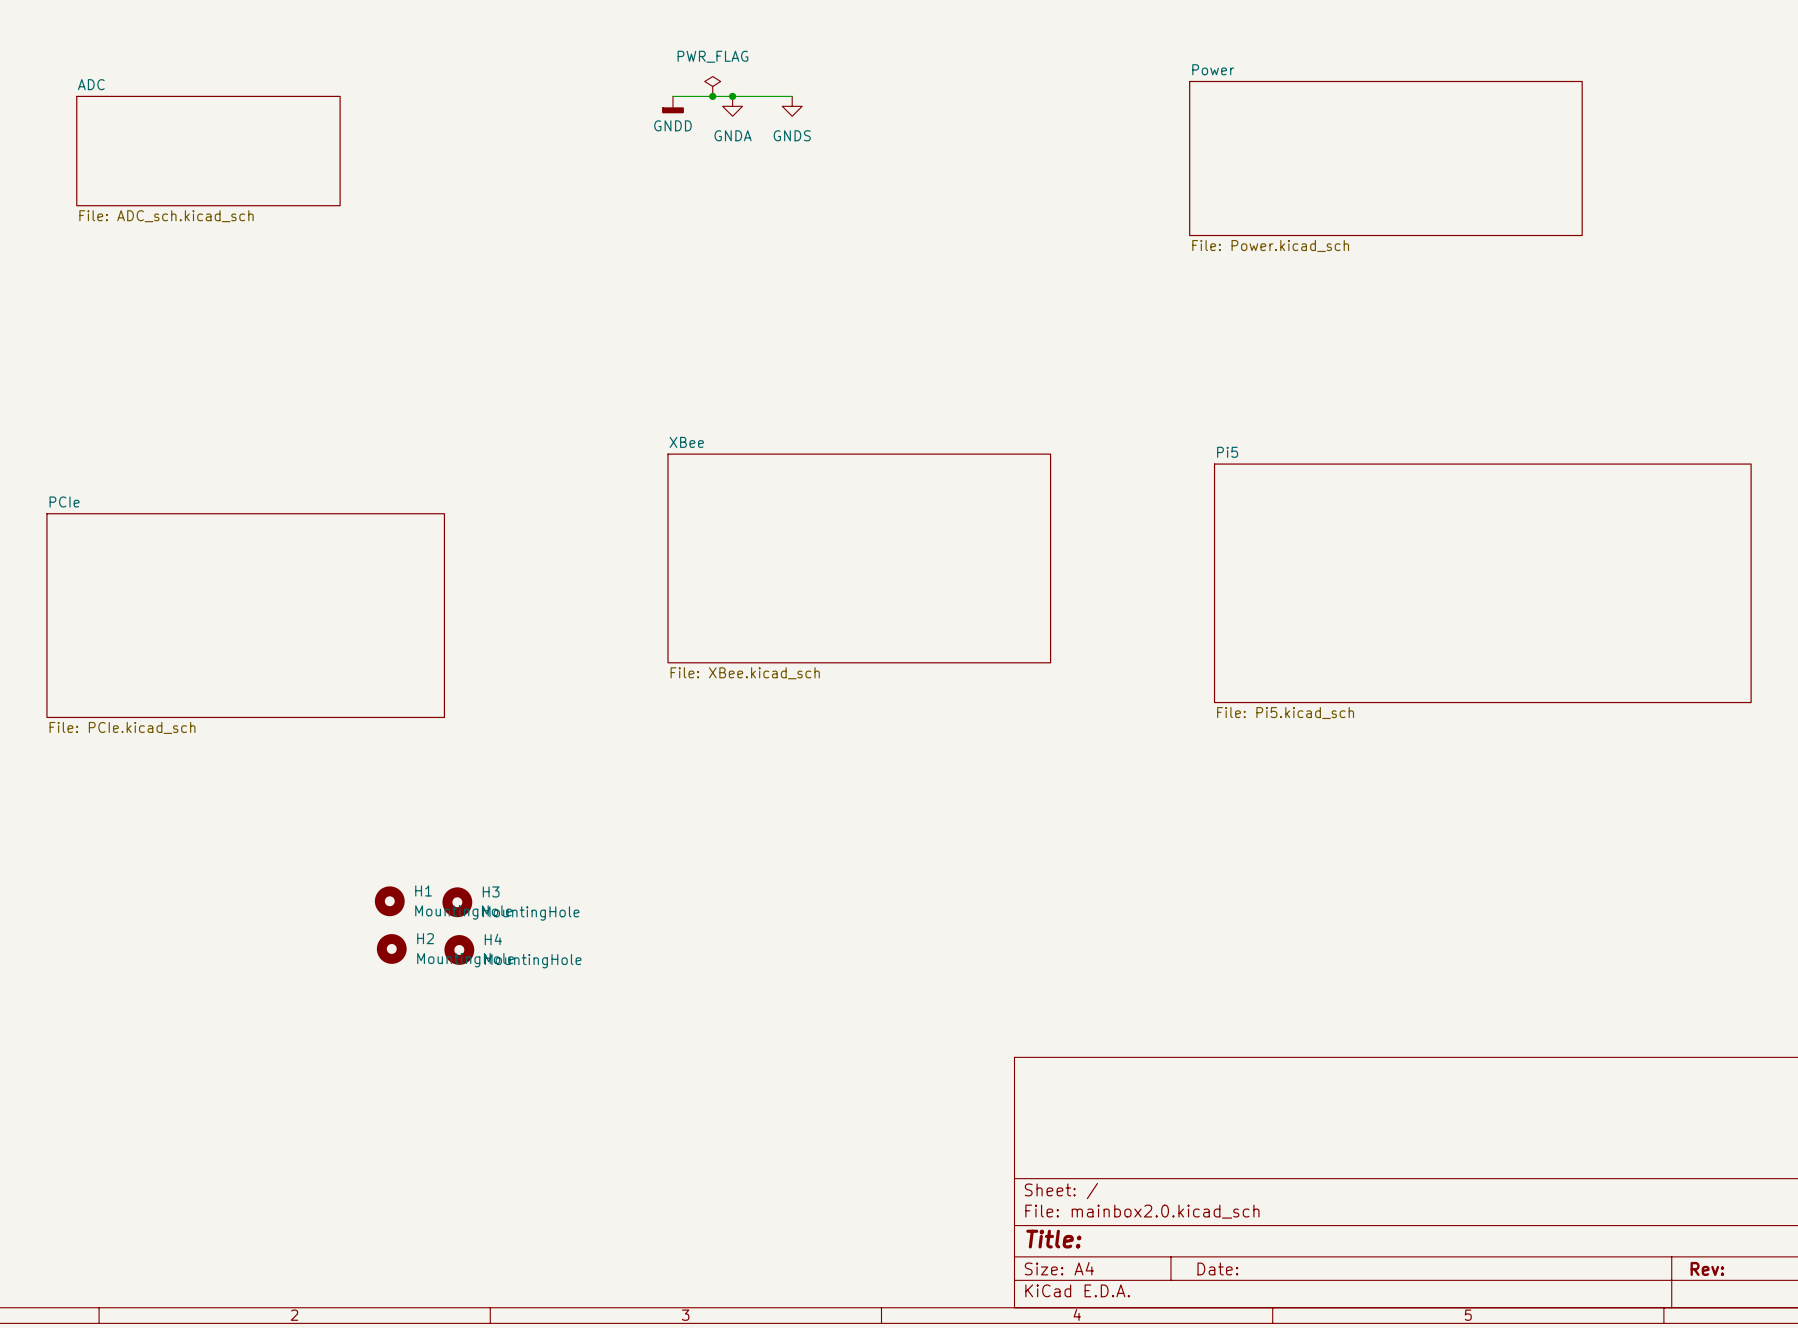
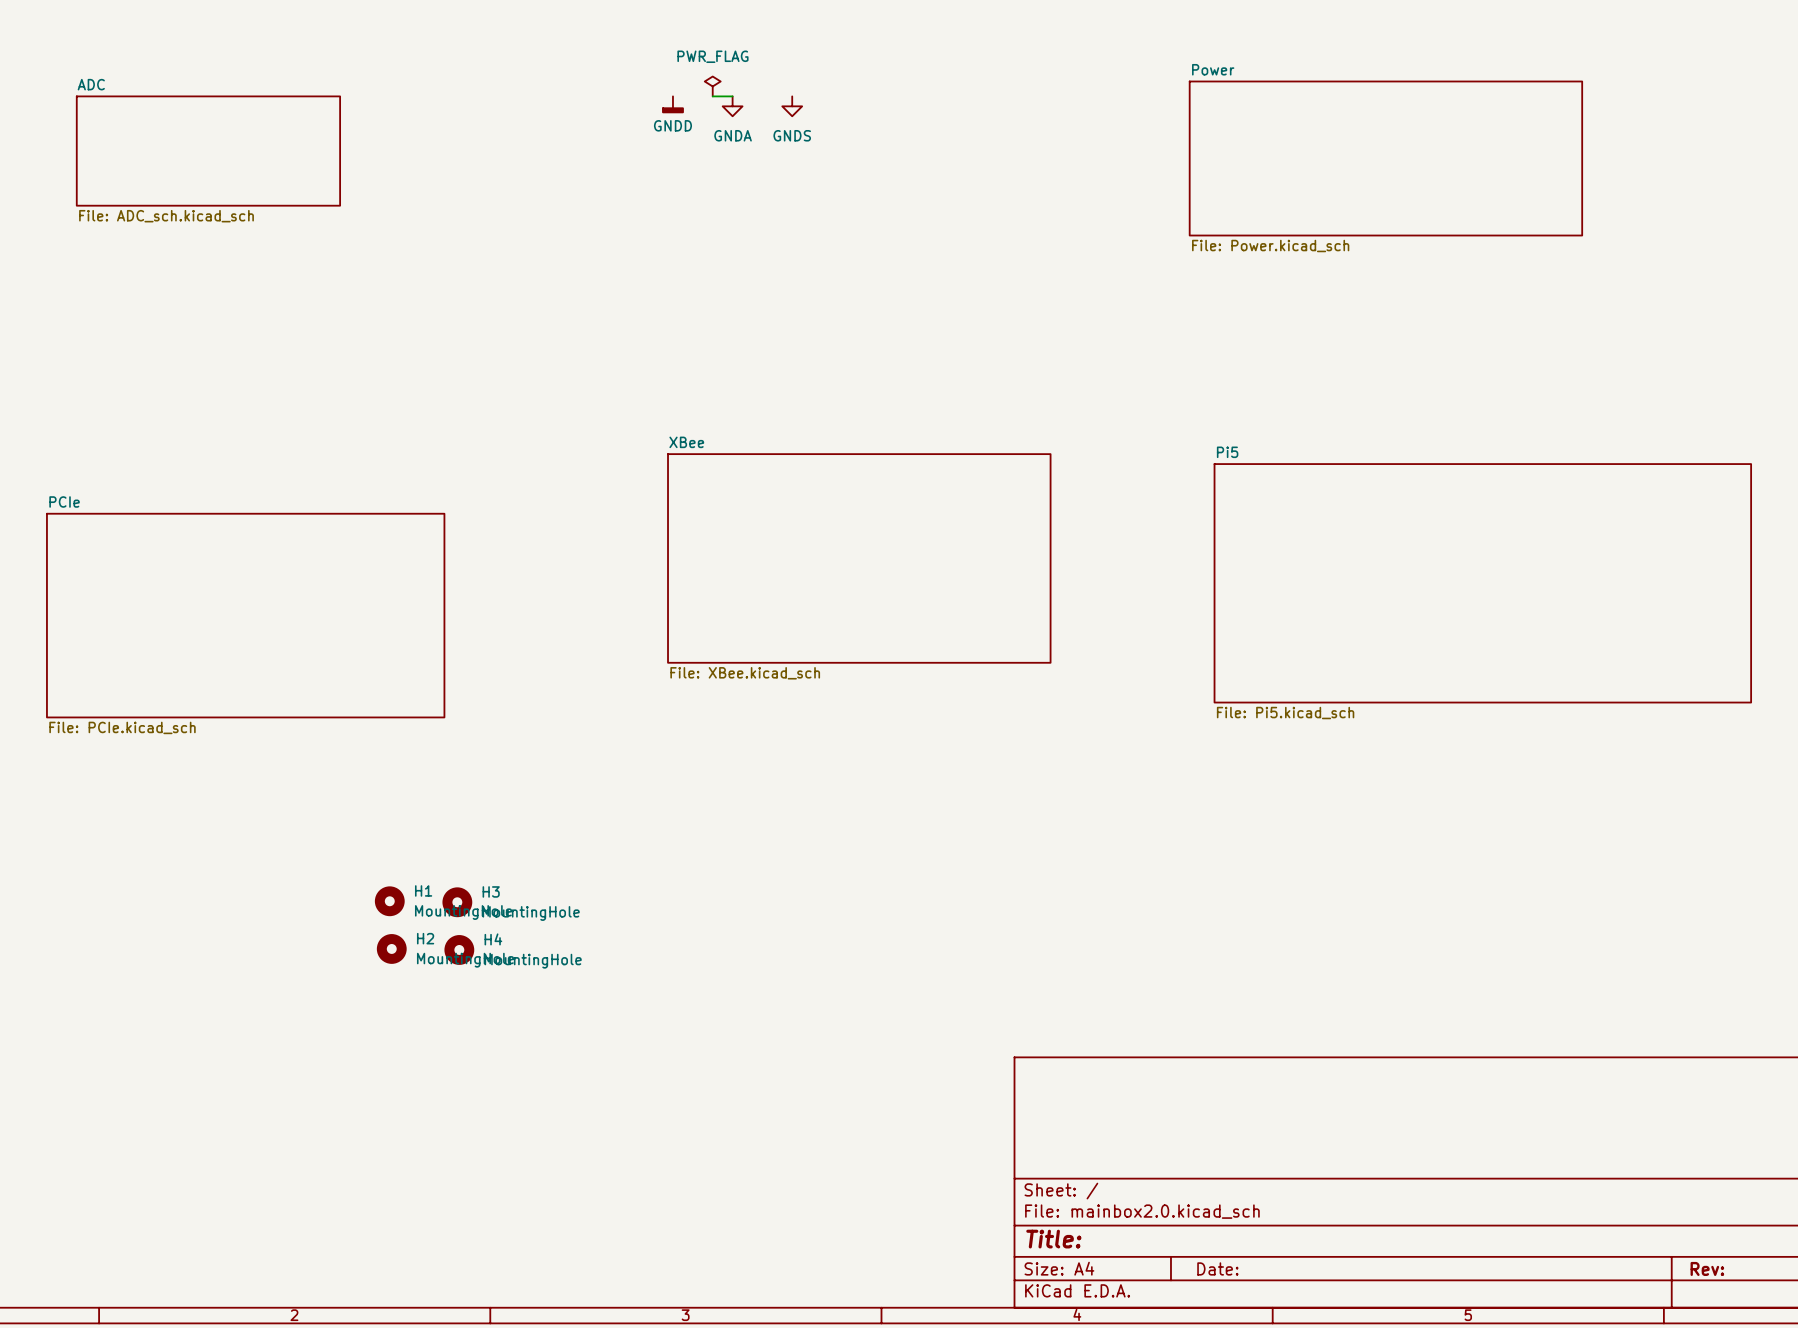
wire: (672, 96) (712, 96) -> none
junction: (712, 96) -> none
wire: (732, 96) (792, 96) -> none
junction: (732, 96) -> none

